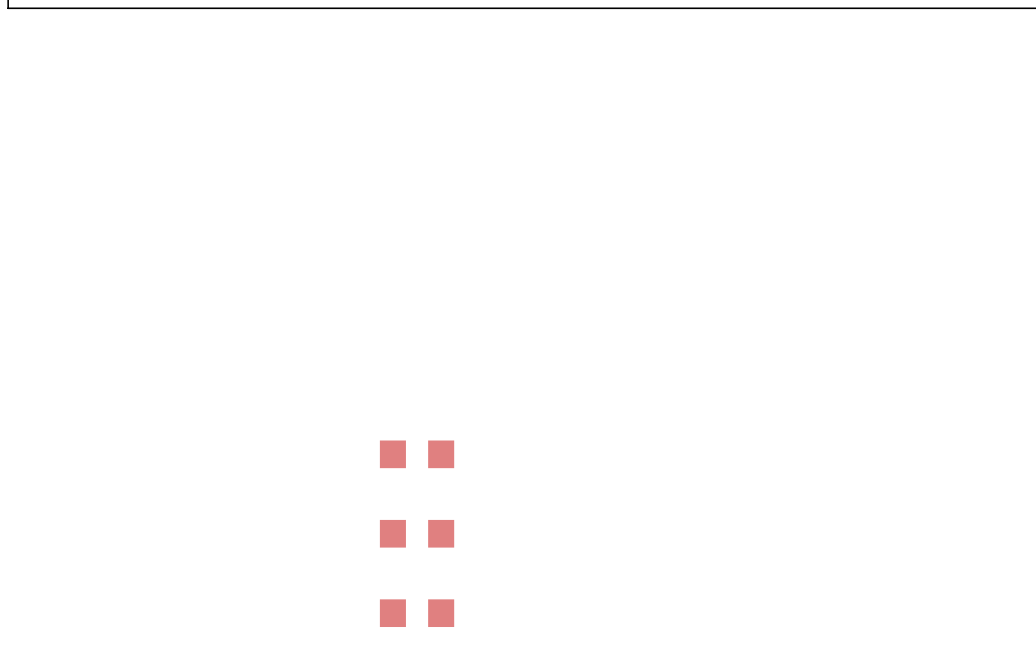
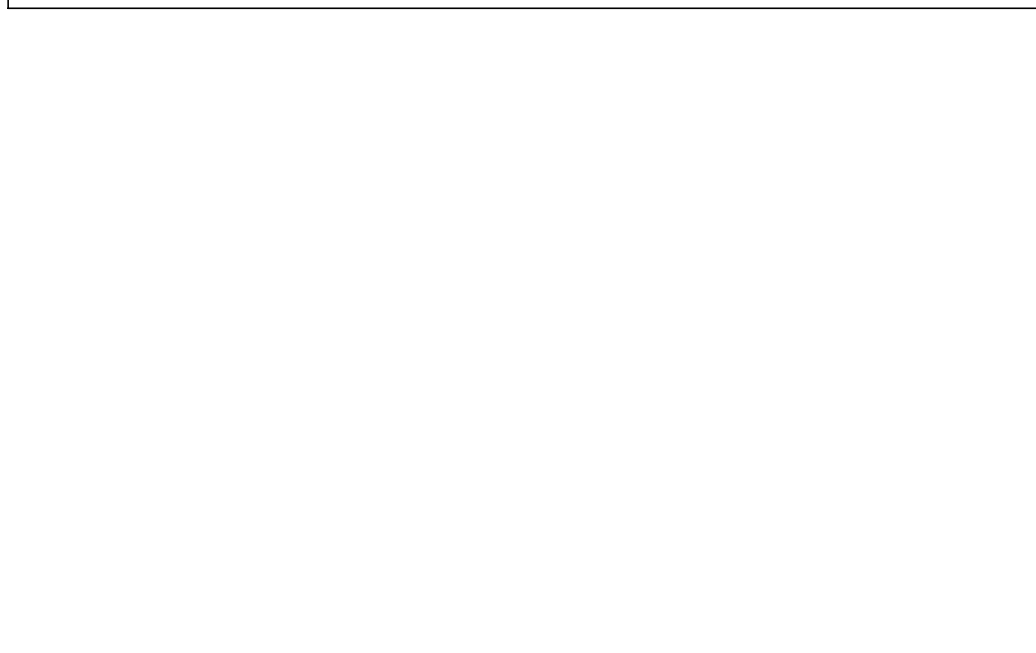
part: (417, 454) -> none
part: (417, 533) -> none
part: (417, 613) -> none

